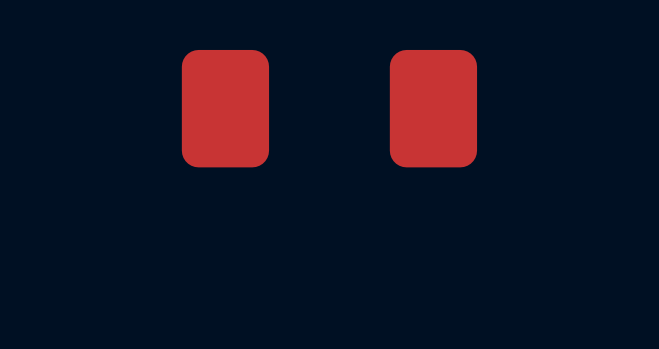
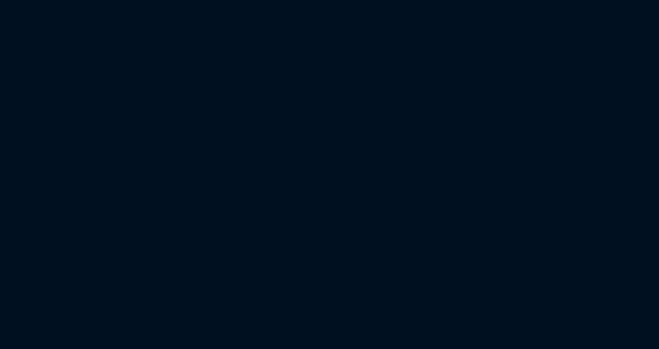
part: (329, 108) -> none

